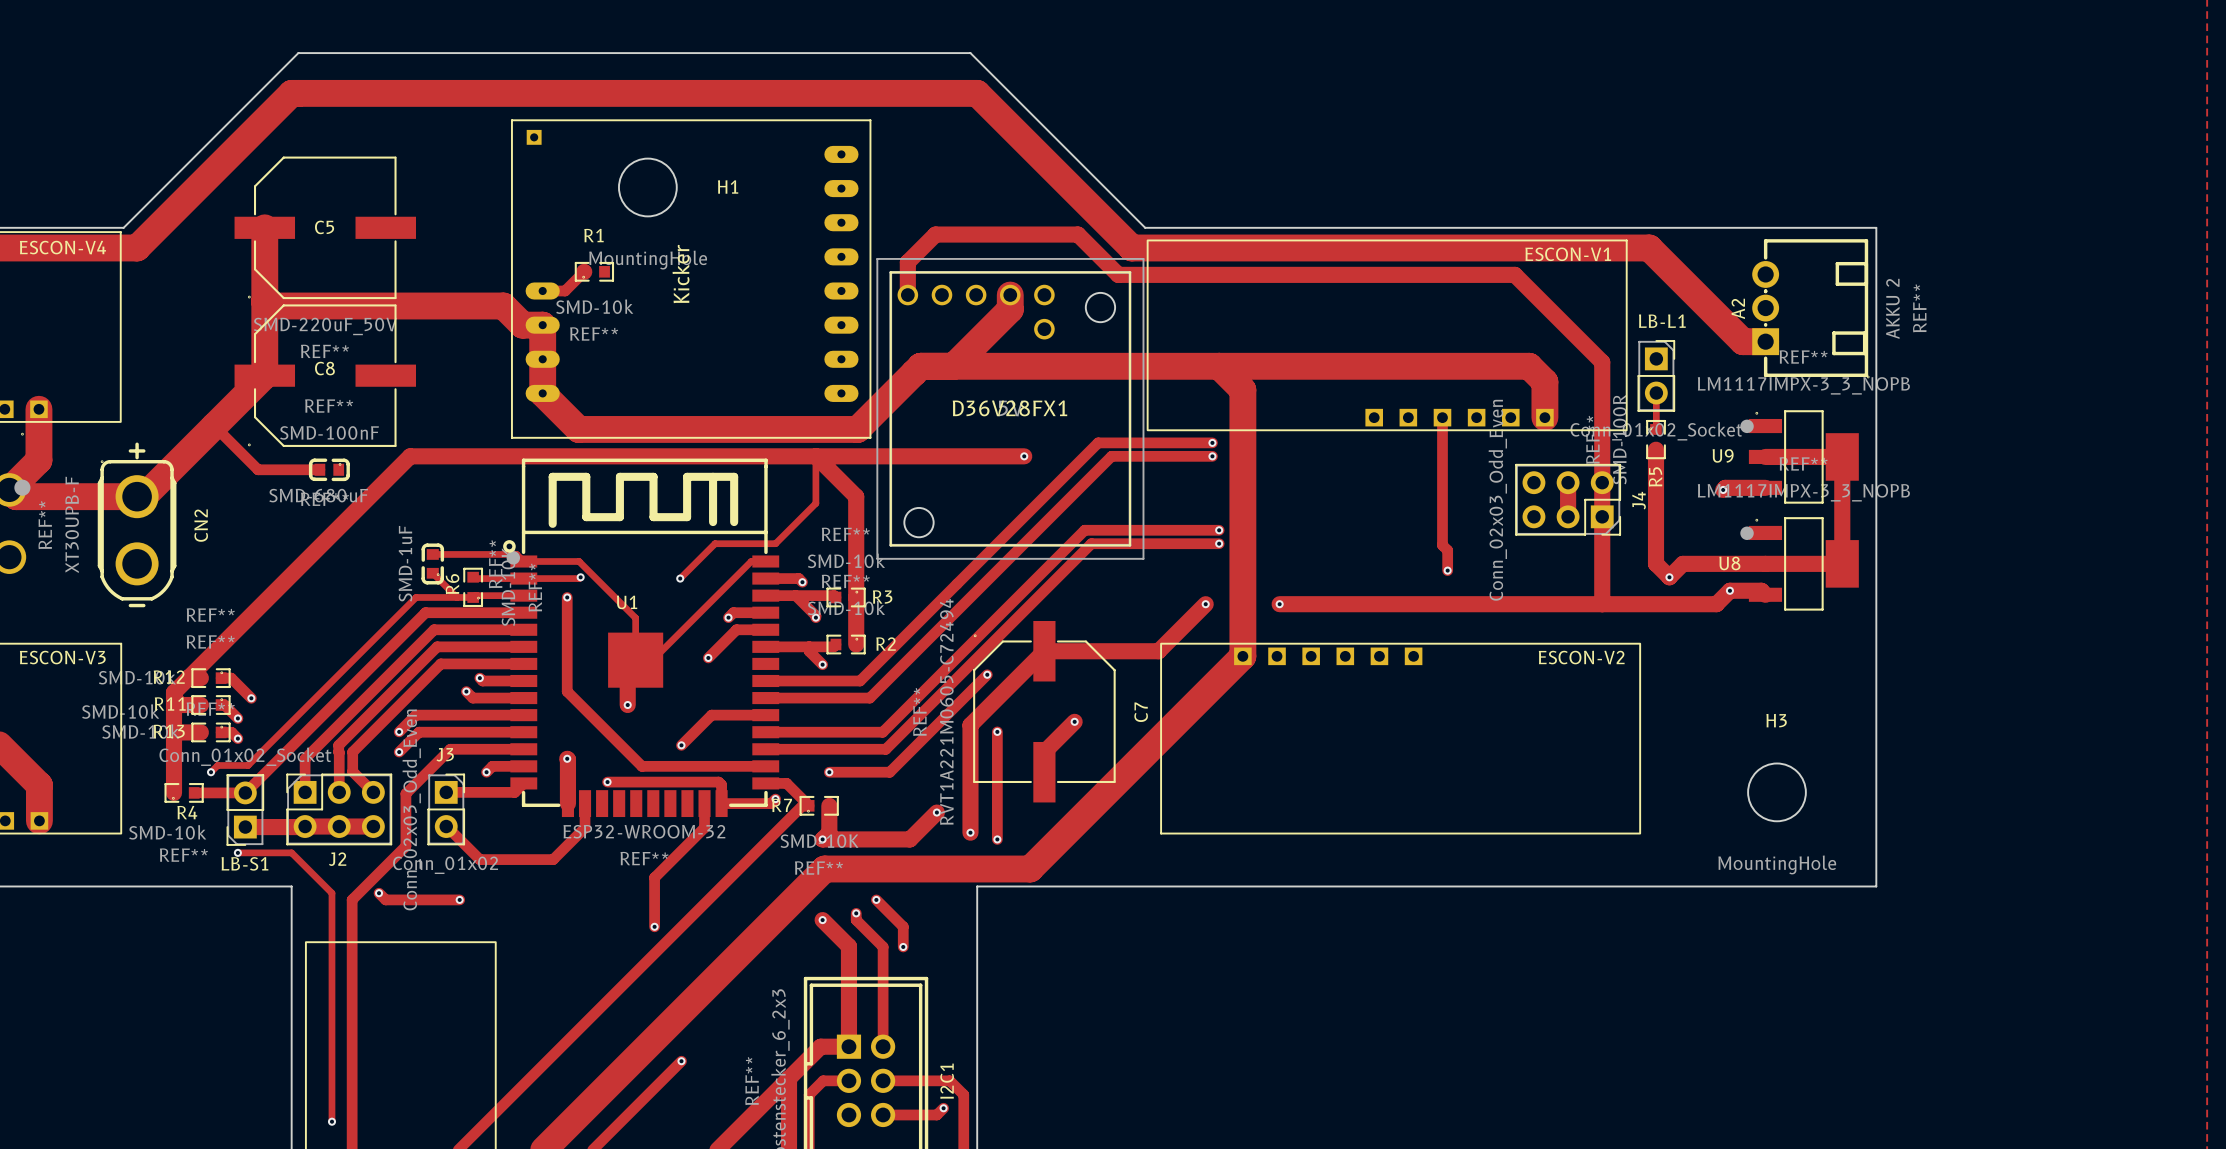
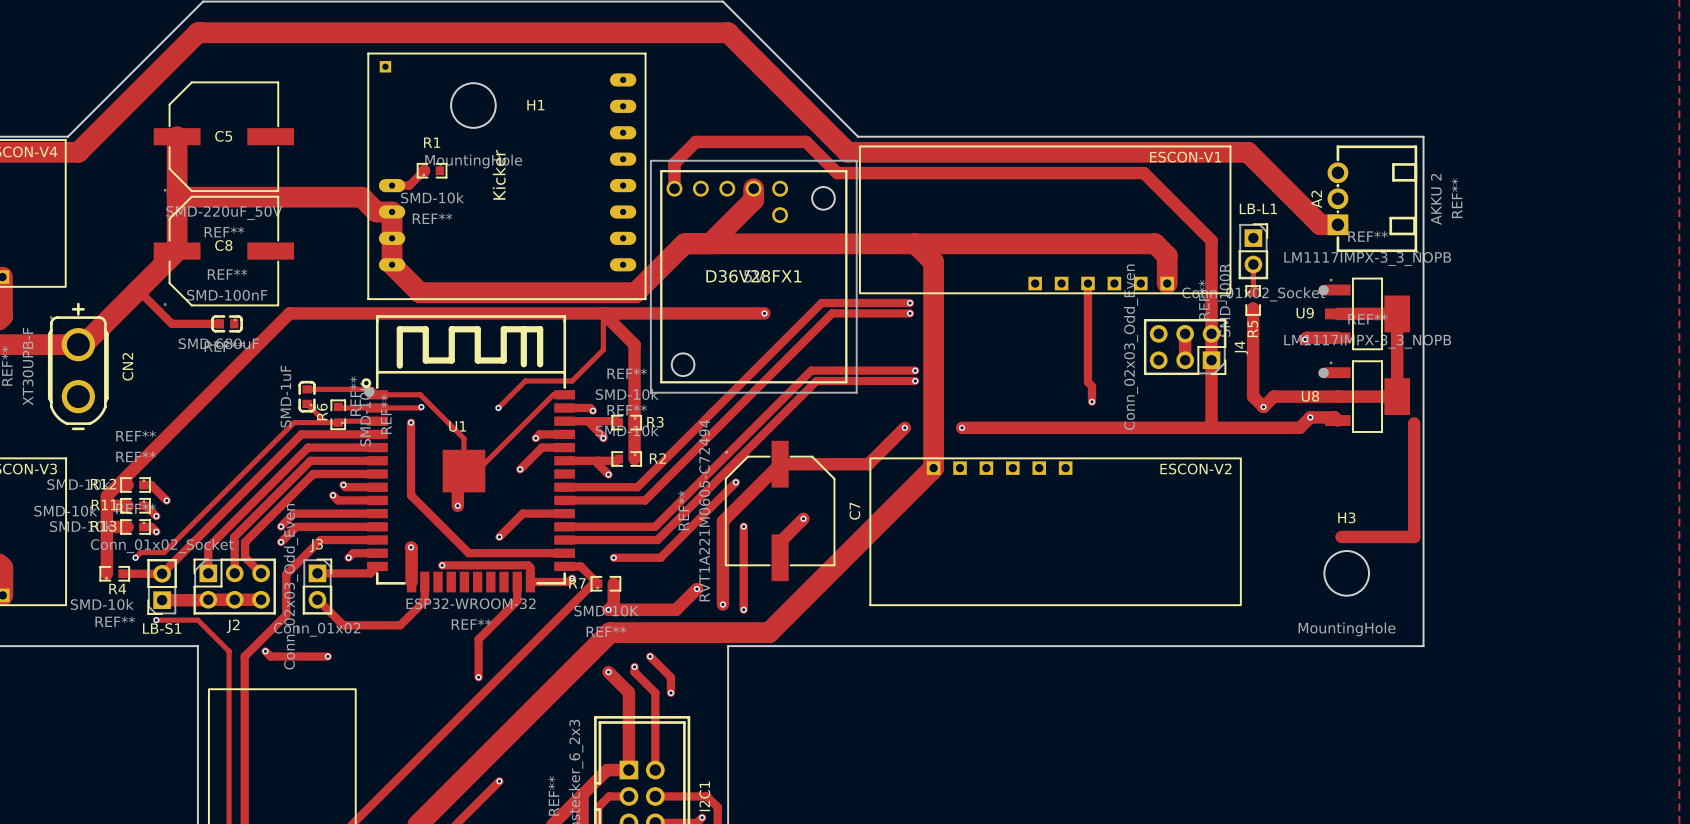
track: none -> (1414, 423) (1414, 536) (1341, 536)

